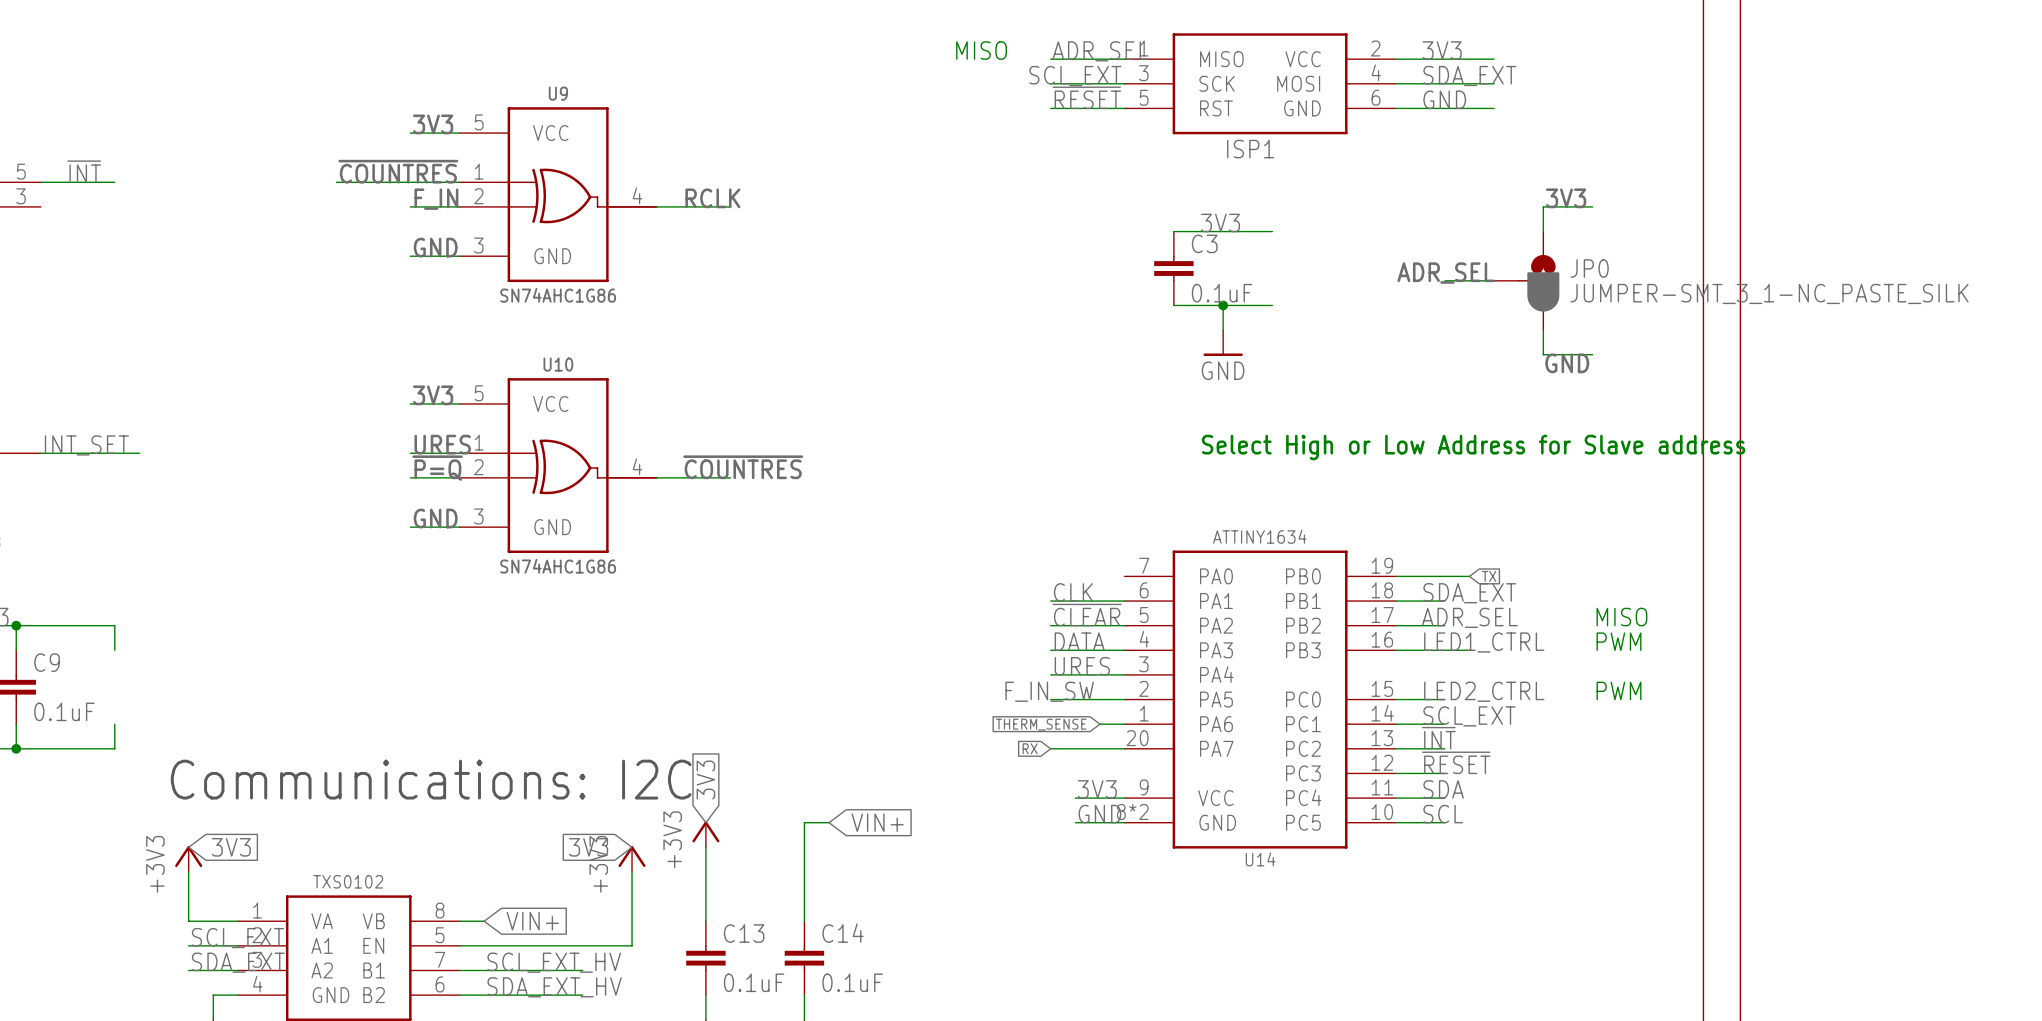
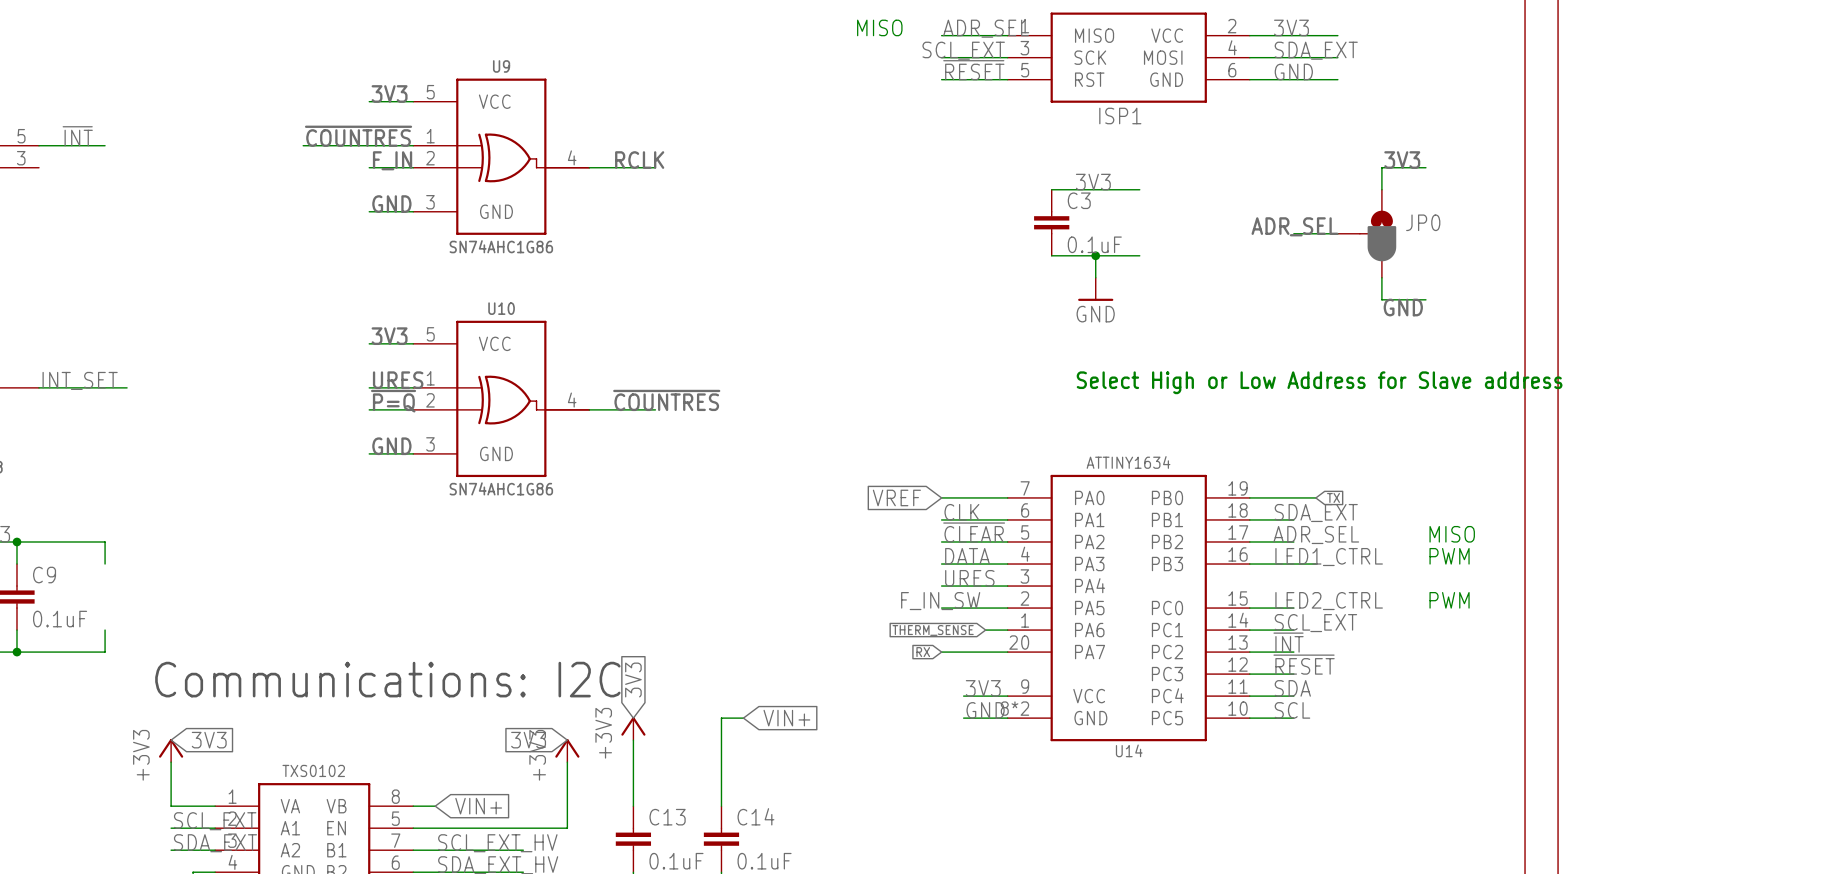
JP0 value: JUMPER-SMT_3_1-NC_PASTE_SILK (1769, 293) -> none
global label: none -> VREF (896, 497)
wire: none -> (941, 497) (1007, 497)

